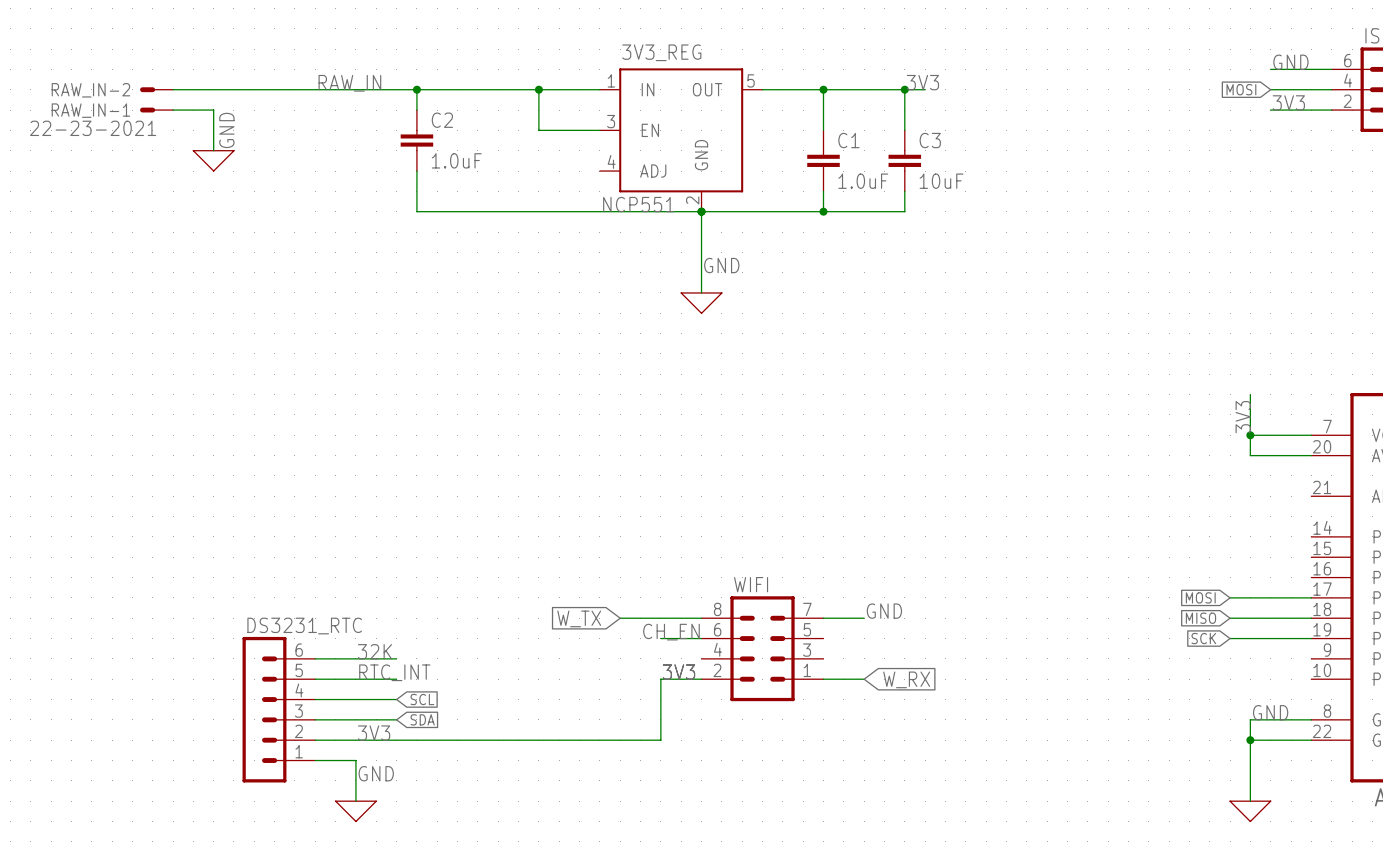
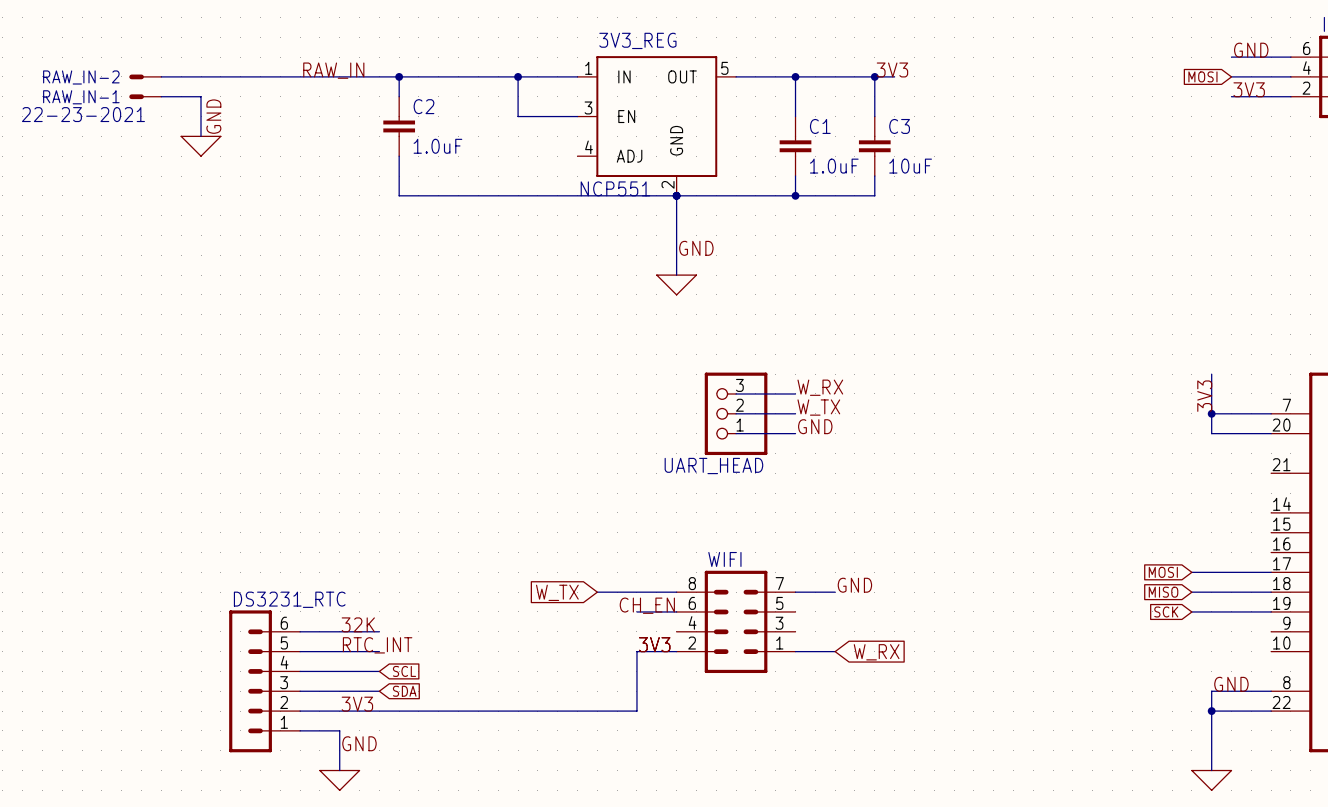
label: none -> W_RX (820, 387)
wire: none -> (736, 393) (795, 393)
label: none -> W_TX (818, 407)
wire: none -> (736, 413) (795, 413)
UART_HEAD: none -> (736, 413)
label: none -> GND (815, 426)
wire: none -> (736, 433) (795, 433)

